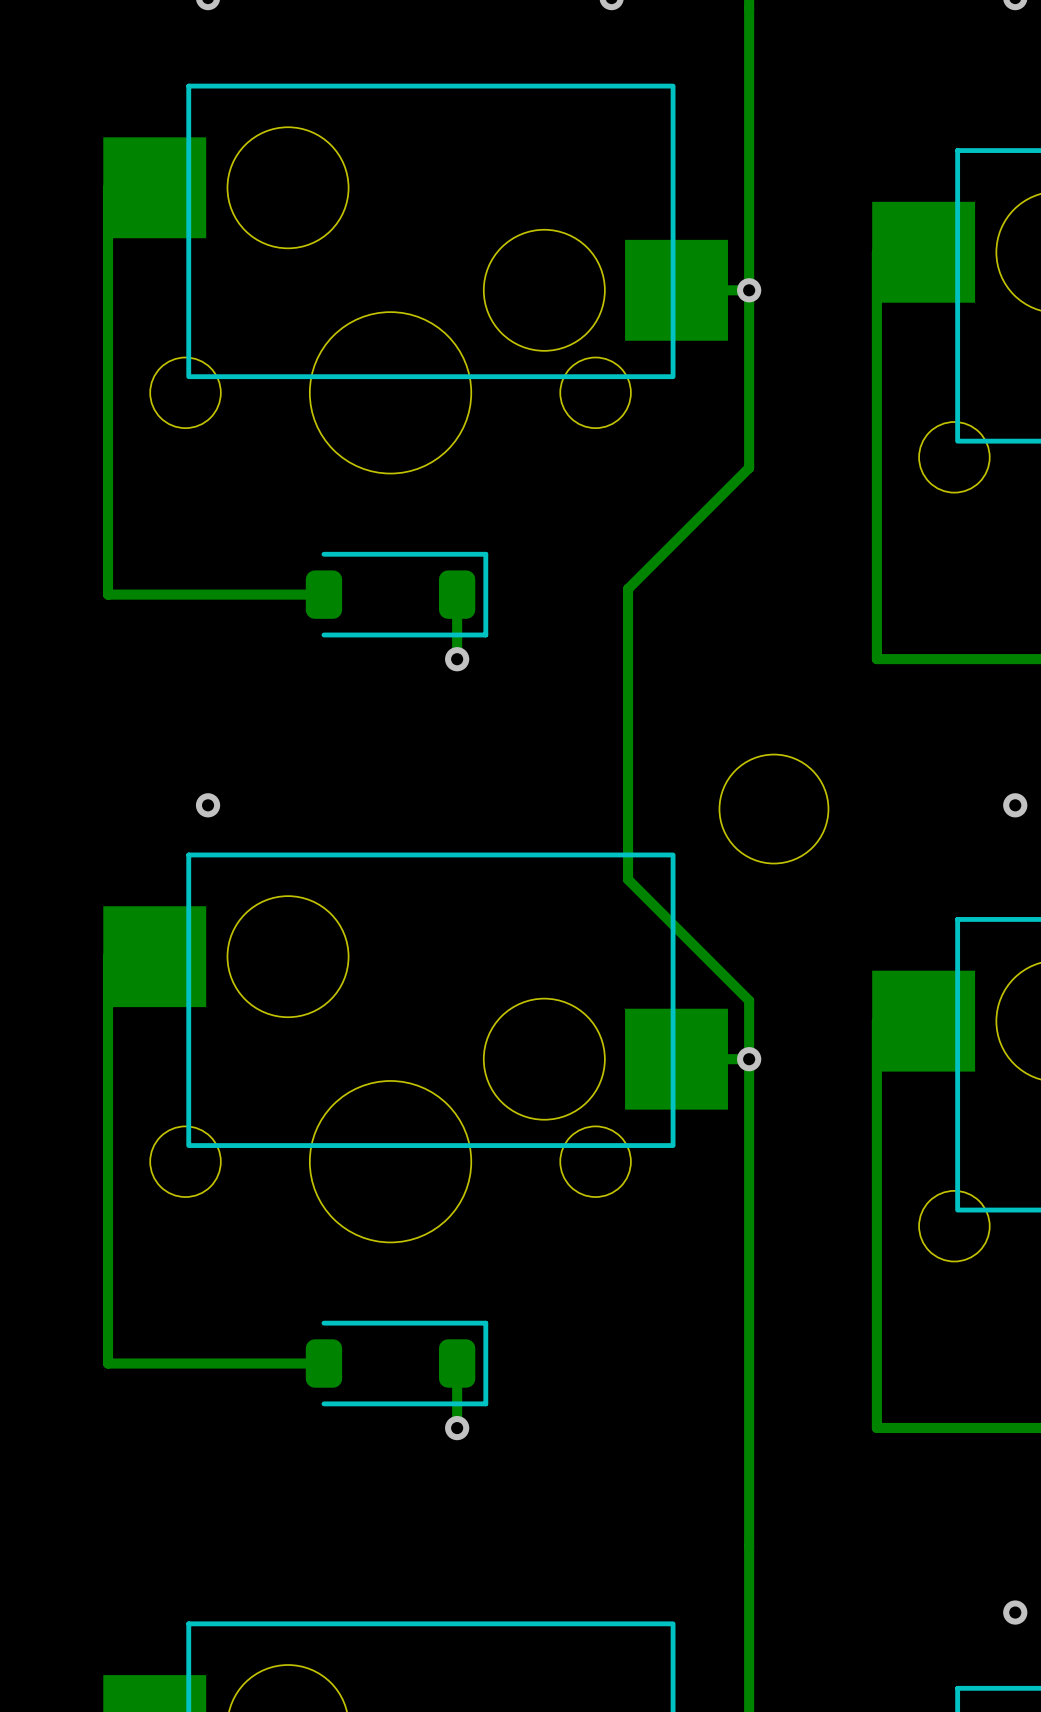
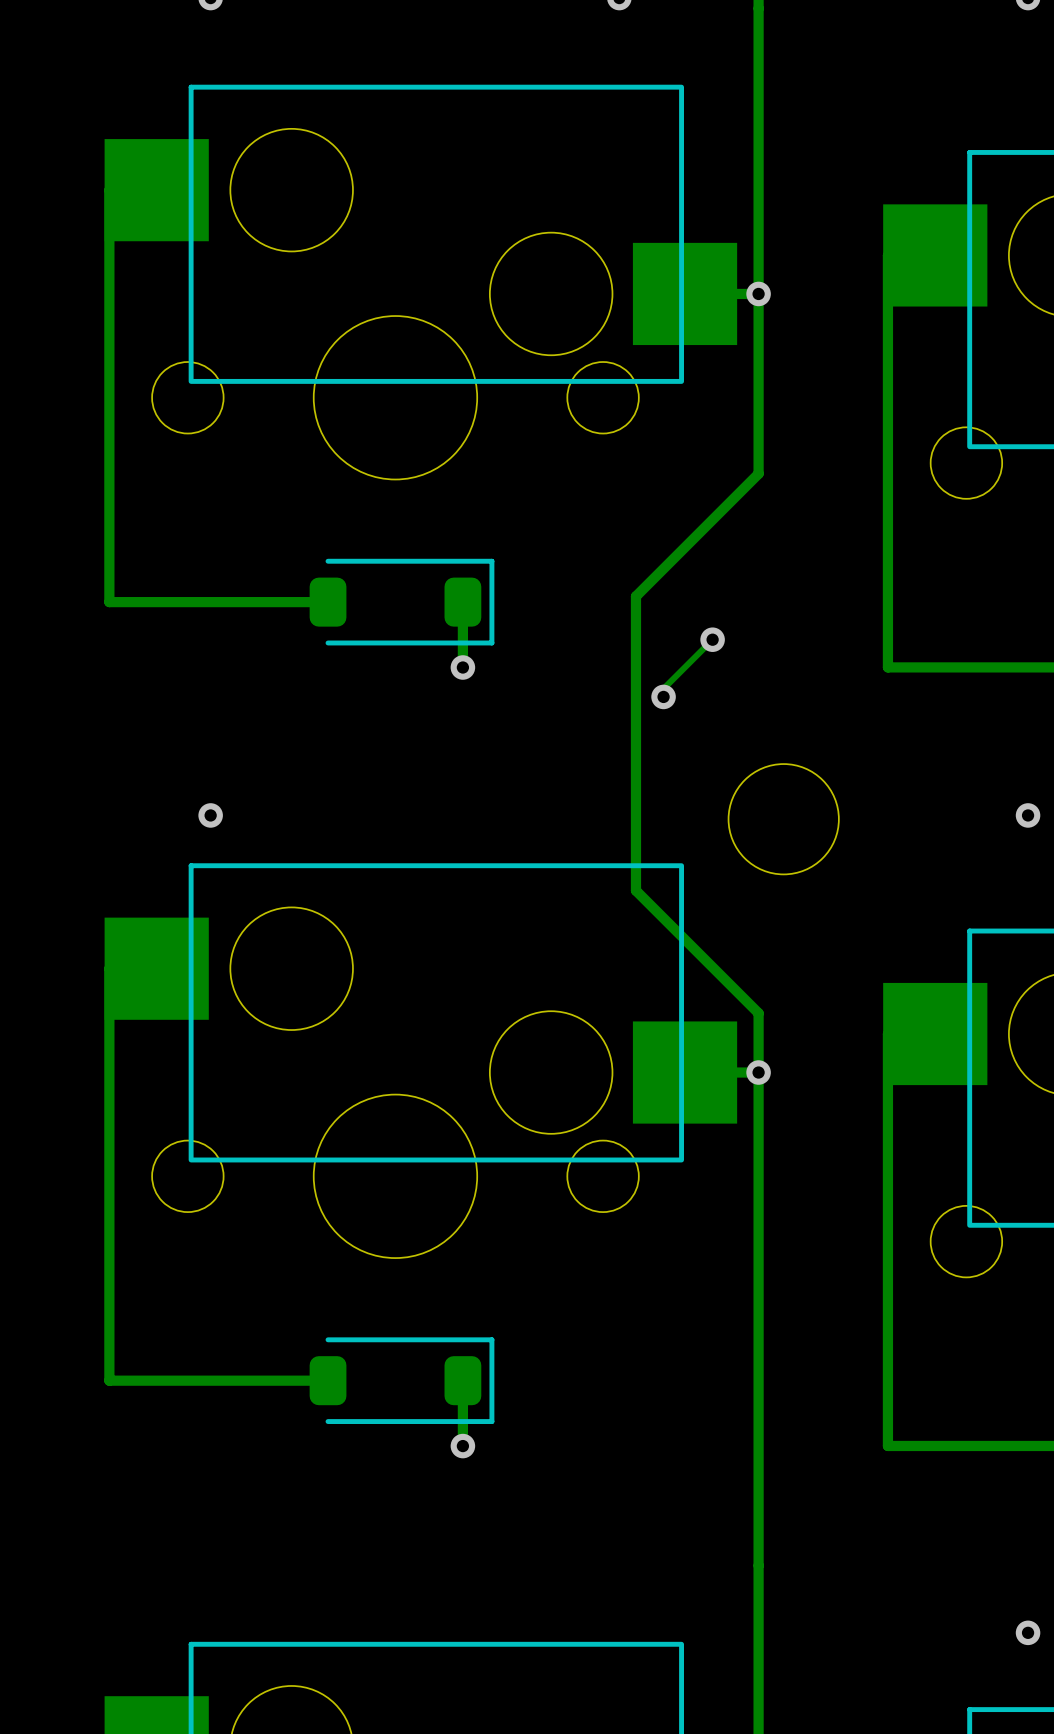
track: none -> (712, 639) (663, 688) (663, 696)
via: none -> (712, 639)
via: none -> (663, 696)

